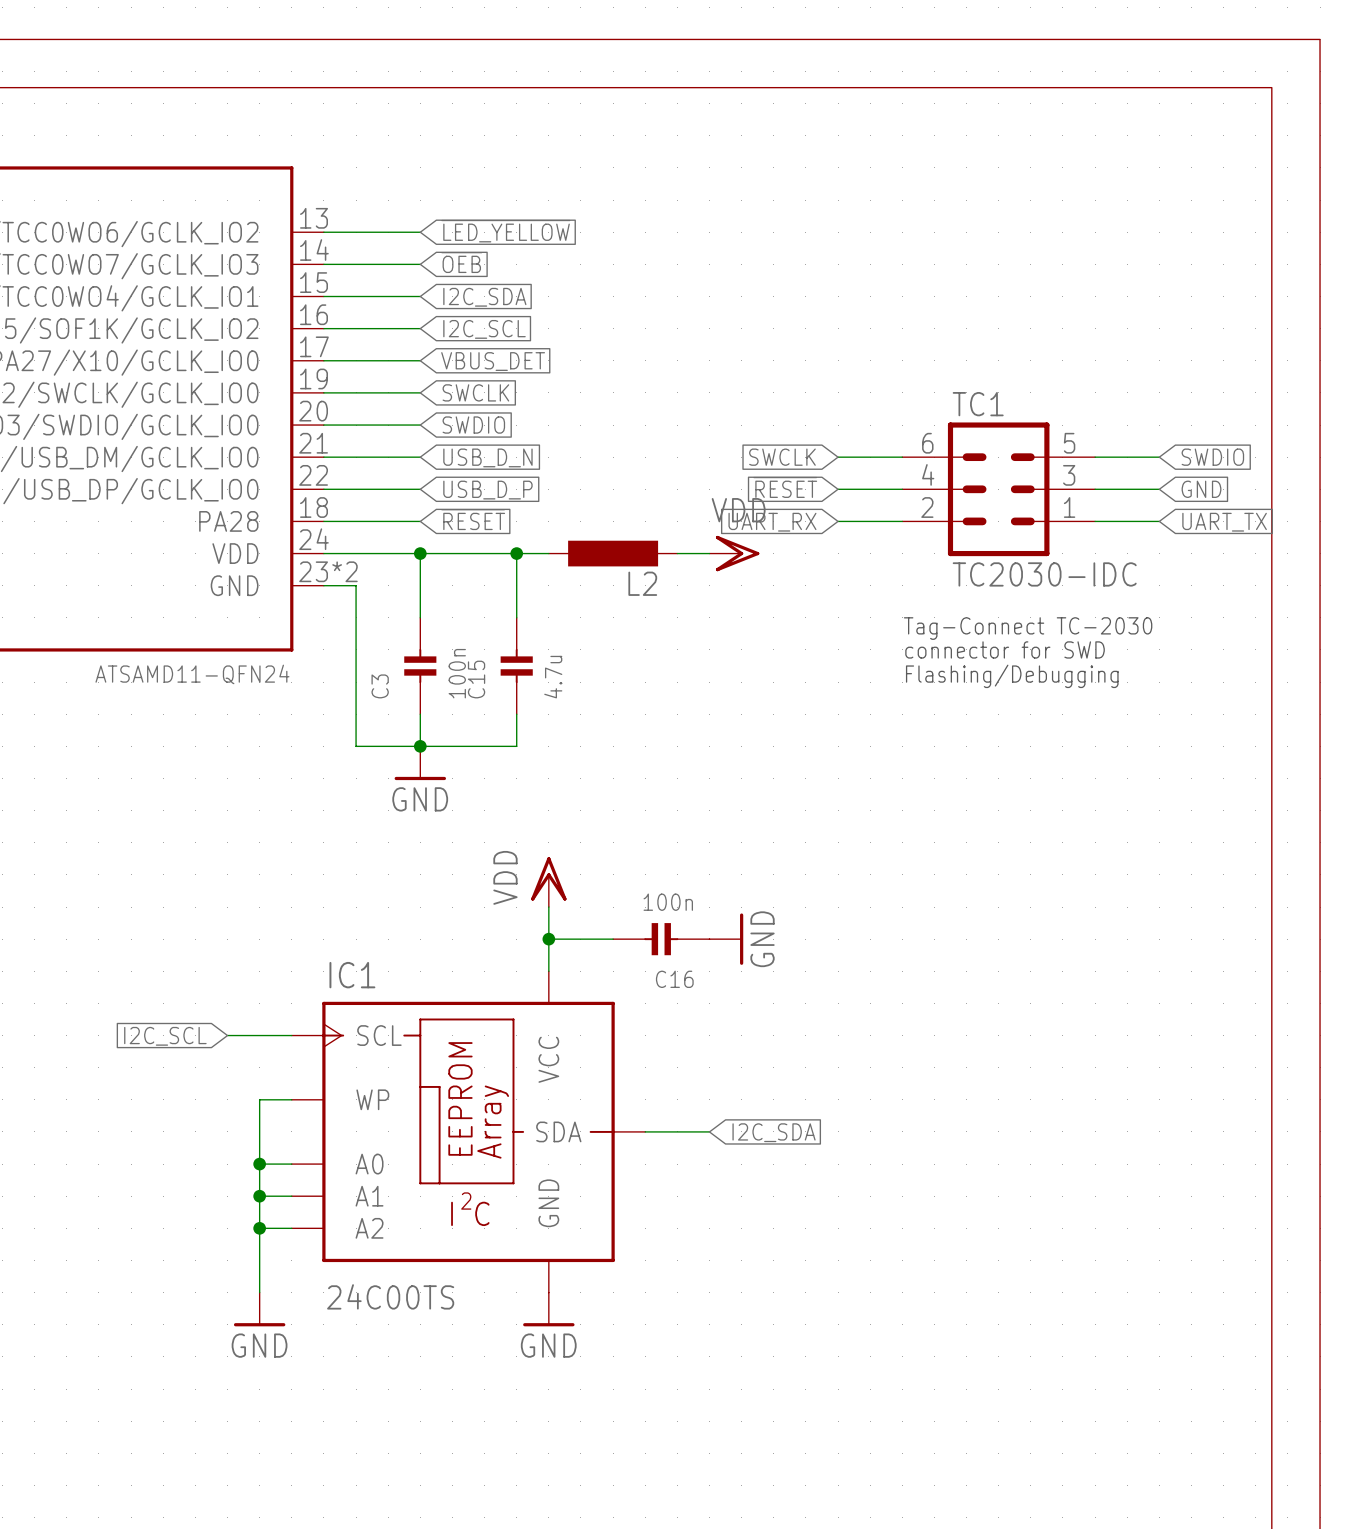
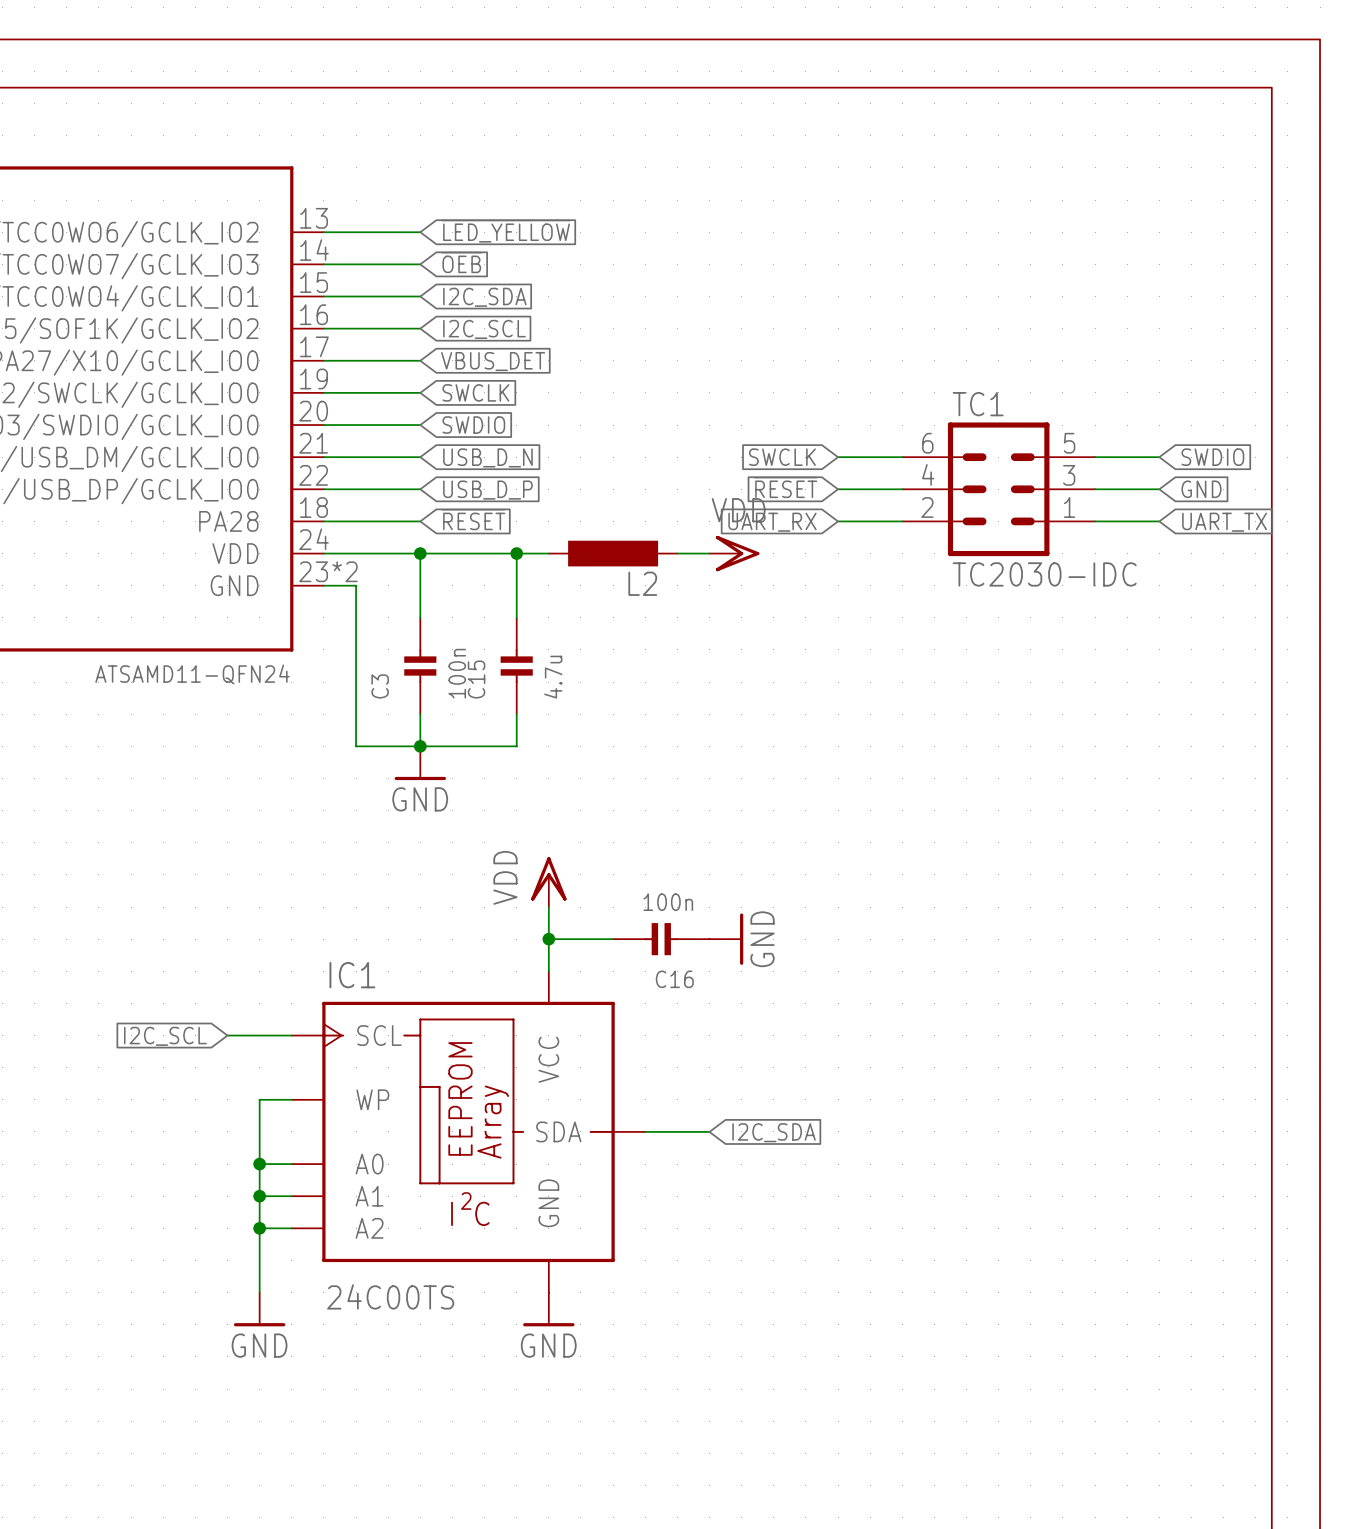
text: Tag-Connect TC-2030 (1028, 628) -> none
text: connector for SWD (1005, 649) -> none
text: Flashing/Debugging (1012, 676) -> none

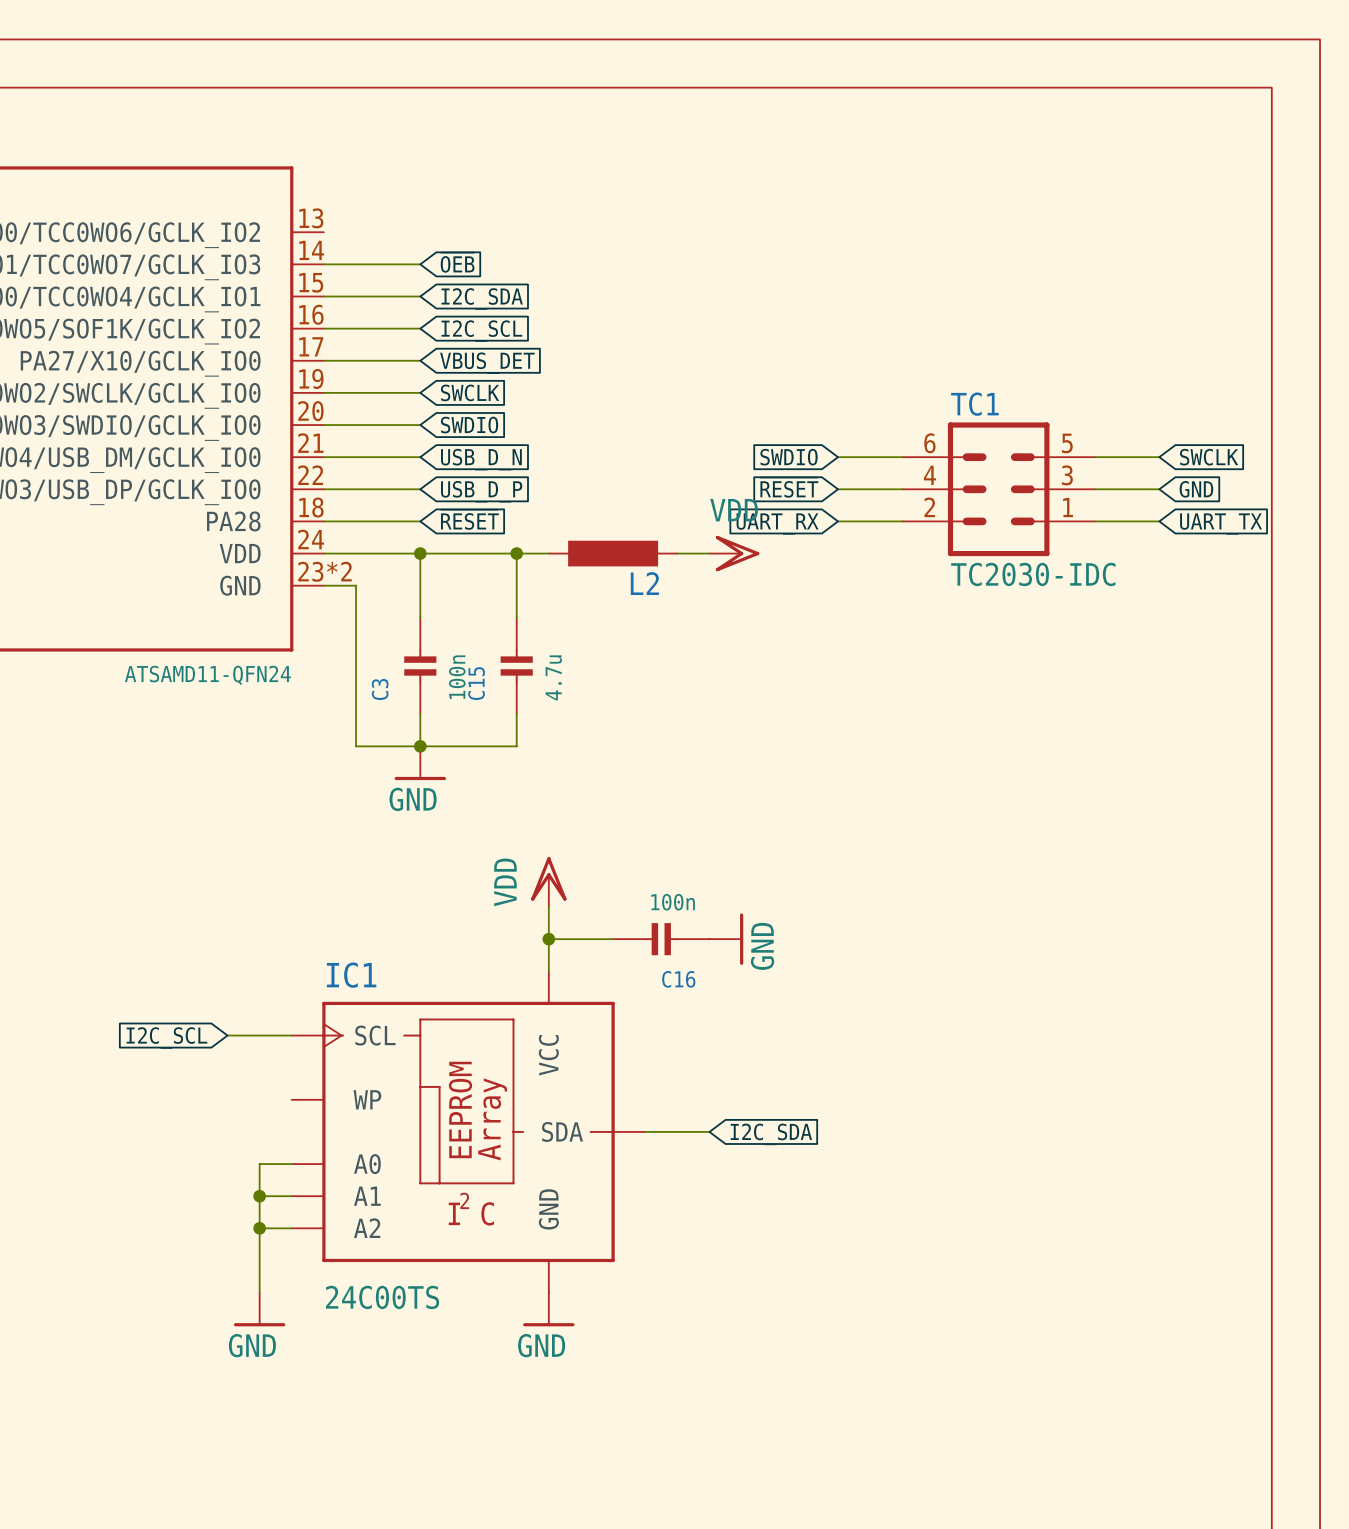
global label: ~{LED_YELLOW} (505, 231) -> none
wire: (323, 232) (420, 232) -> none
global label: SWCLK (782, 457) -> SWDIO (789, 457)
global label: SWDIO (1212, 457) -> SWCLK (1209, 457)
wire: (291, 1099) (259, 1099) (259, 1164) -> none
junction: (259, 1164) -> none

